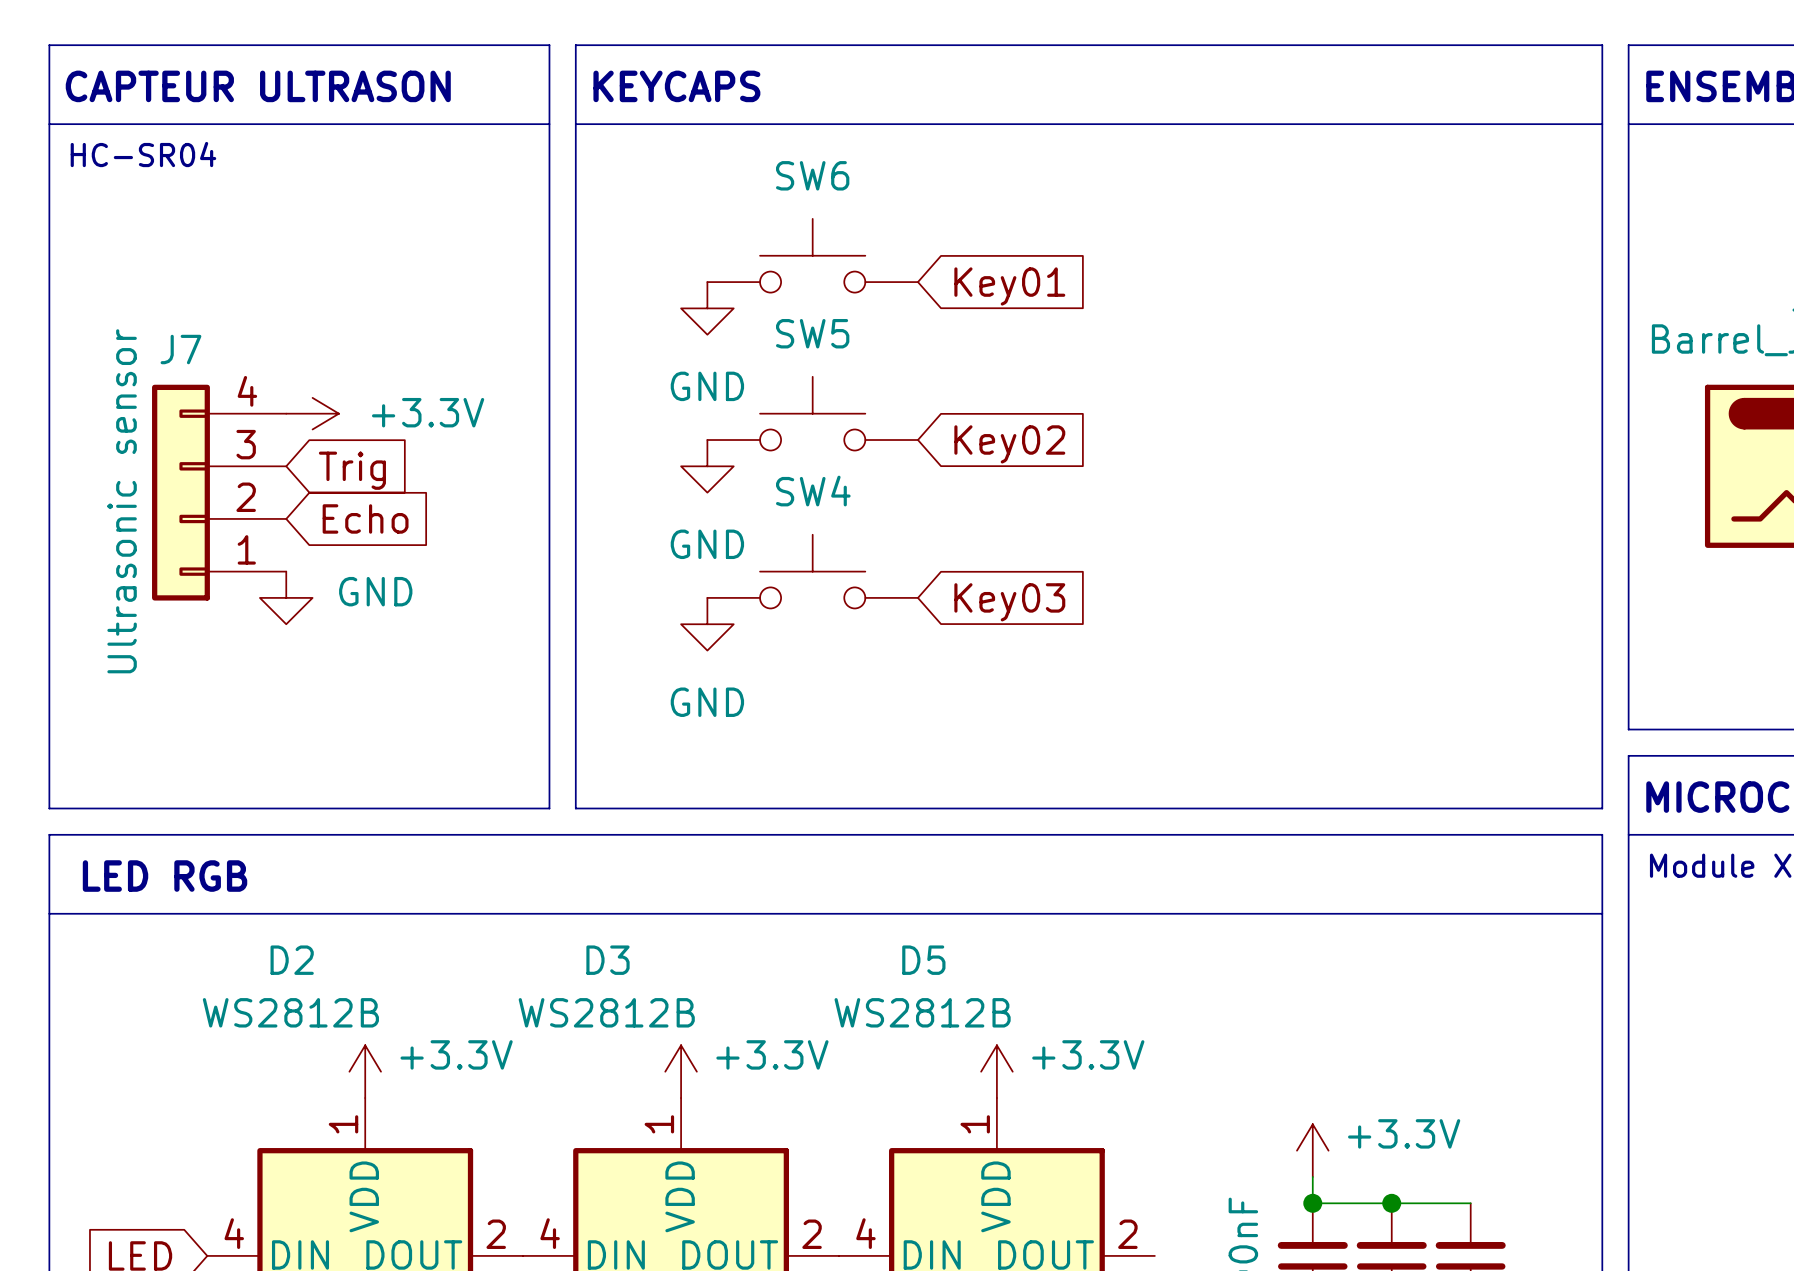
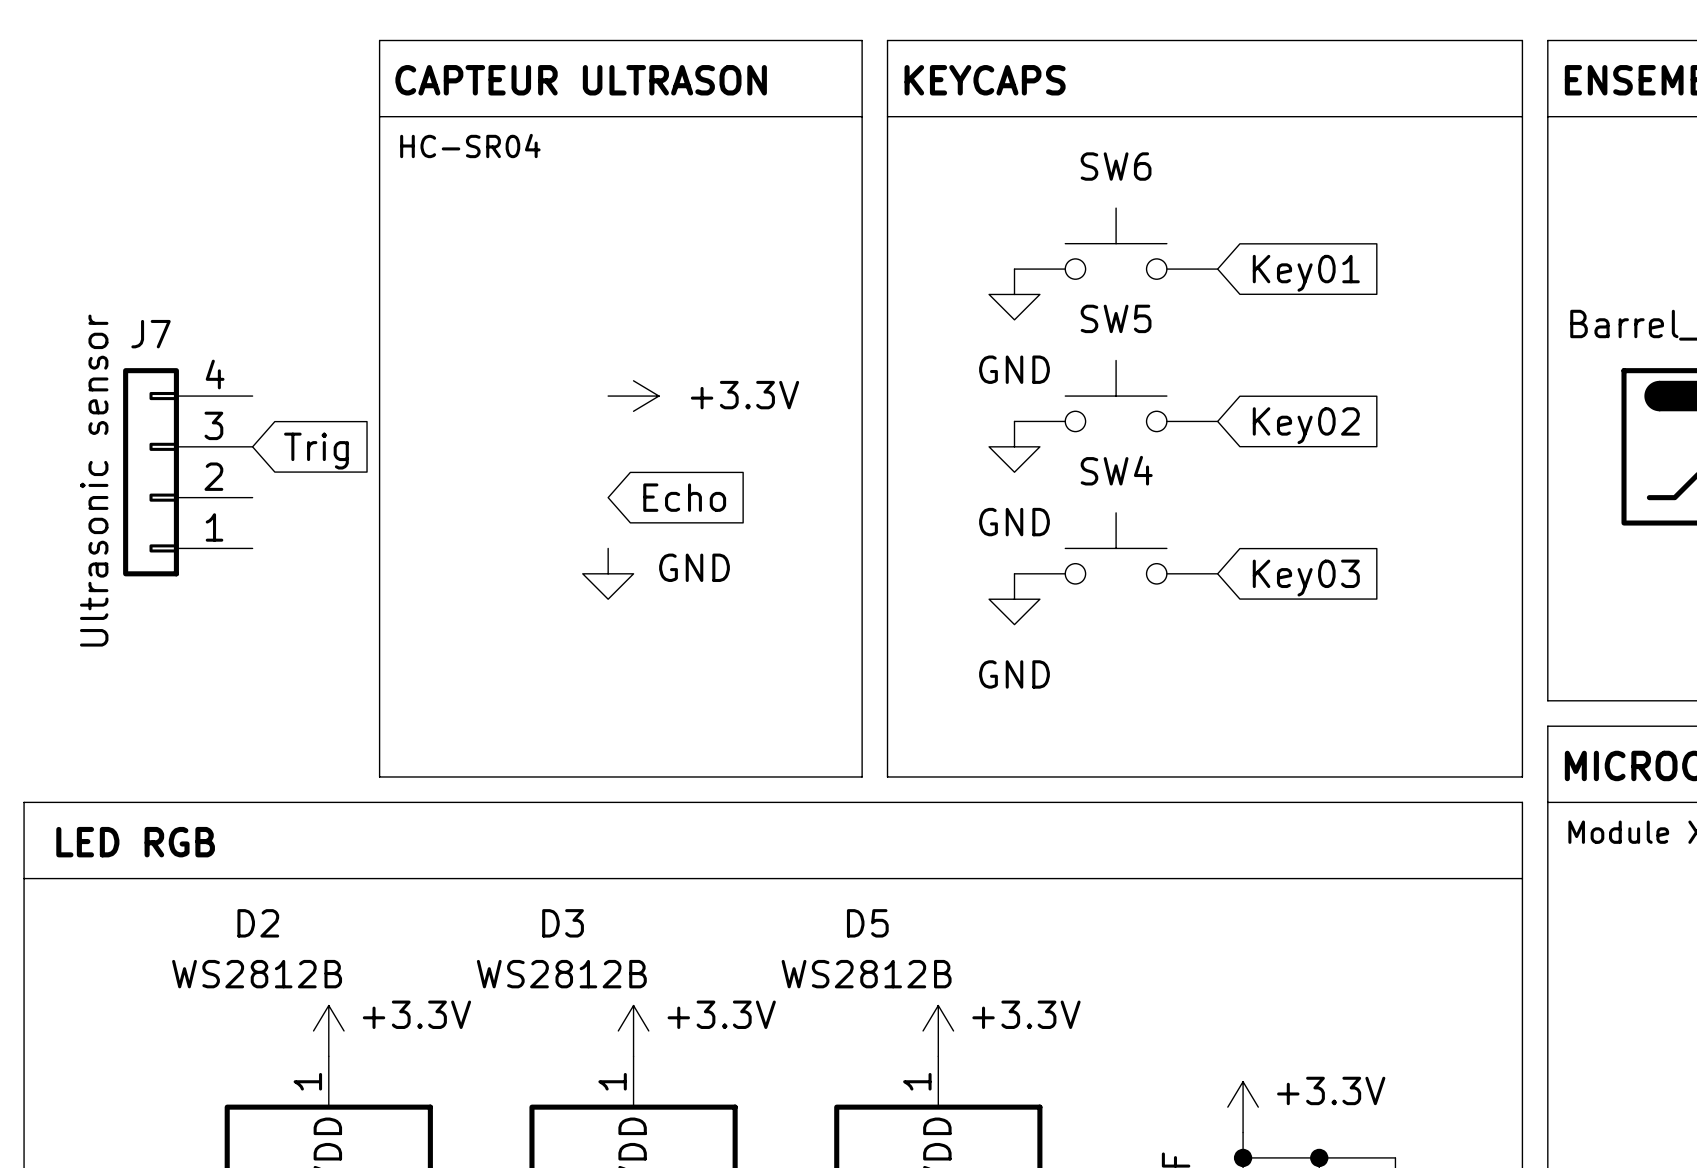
line: (417, 45) (49, 45) (49, 808) (417, 808) -> (379, 40) (379, 776)
line: (549, 45) (549, 808) -> (506, 40) (531, 40)
line: (575, 45) (575, 808) -> (506, 776) (531, 776)
line: (917, 45) (944, 45) -> (862, 40) (862, 776)
text position: CAPTEUR ULTRASON (258, 86) -> CAPTEUR ULTRASON (581, 80)
text position: KEYCAPS (676, 86) -> KEYCAPS (985, 80)
line: (49, 124) (417, 124) -> none
line: (917, 124) (944, 124) -> (506, 116) (531, 116)
text position: HC-SR04 (143, 154) -> HC-SR04 (470, 146)
SW6 position: (812, 255) -> (1116, 243)
global label position: Key01 (1009, 286) -> Key01 (1306, 273)
power symbol: GND (707, 308) -> none
power symbol: none -> GND (1014, 294)
power symbol position: +3.3V (312, 413) -> +3.3V (633, 396)
SW5 position: (812, 413) -> (1116, 396)
global label position: Key02 (1009, 444) -> Key02 (1306, 425)
power symbol: GND (707, 466) -> none
power symbol: none -> GND (1014, 446)
global label position: Echo (365, 518) -> Echo (684, 497)
SW4 position: (812, 571) -> (1116, 548)
power symbol: GND (286, 597) -> none
global label position: Key03 (1009, 602) -> Key03 (1306, 578)
power symbol position: GND (707, 624) -> GND (608, 573)
power symbol: none -> GND (1014, 599)
power symbol text position: GND (707, 702) -> GND (694, 567)
line: (917, 808) (944, 808) -> (887, 40) (887, 776)

